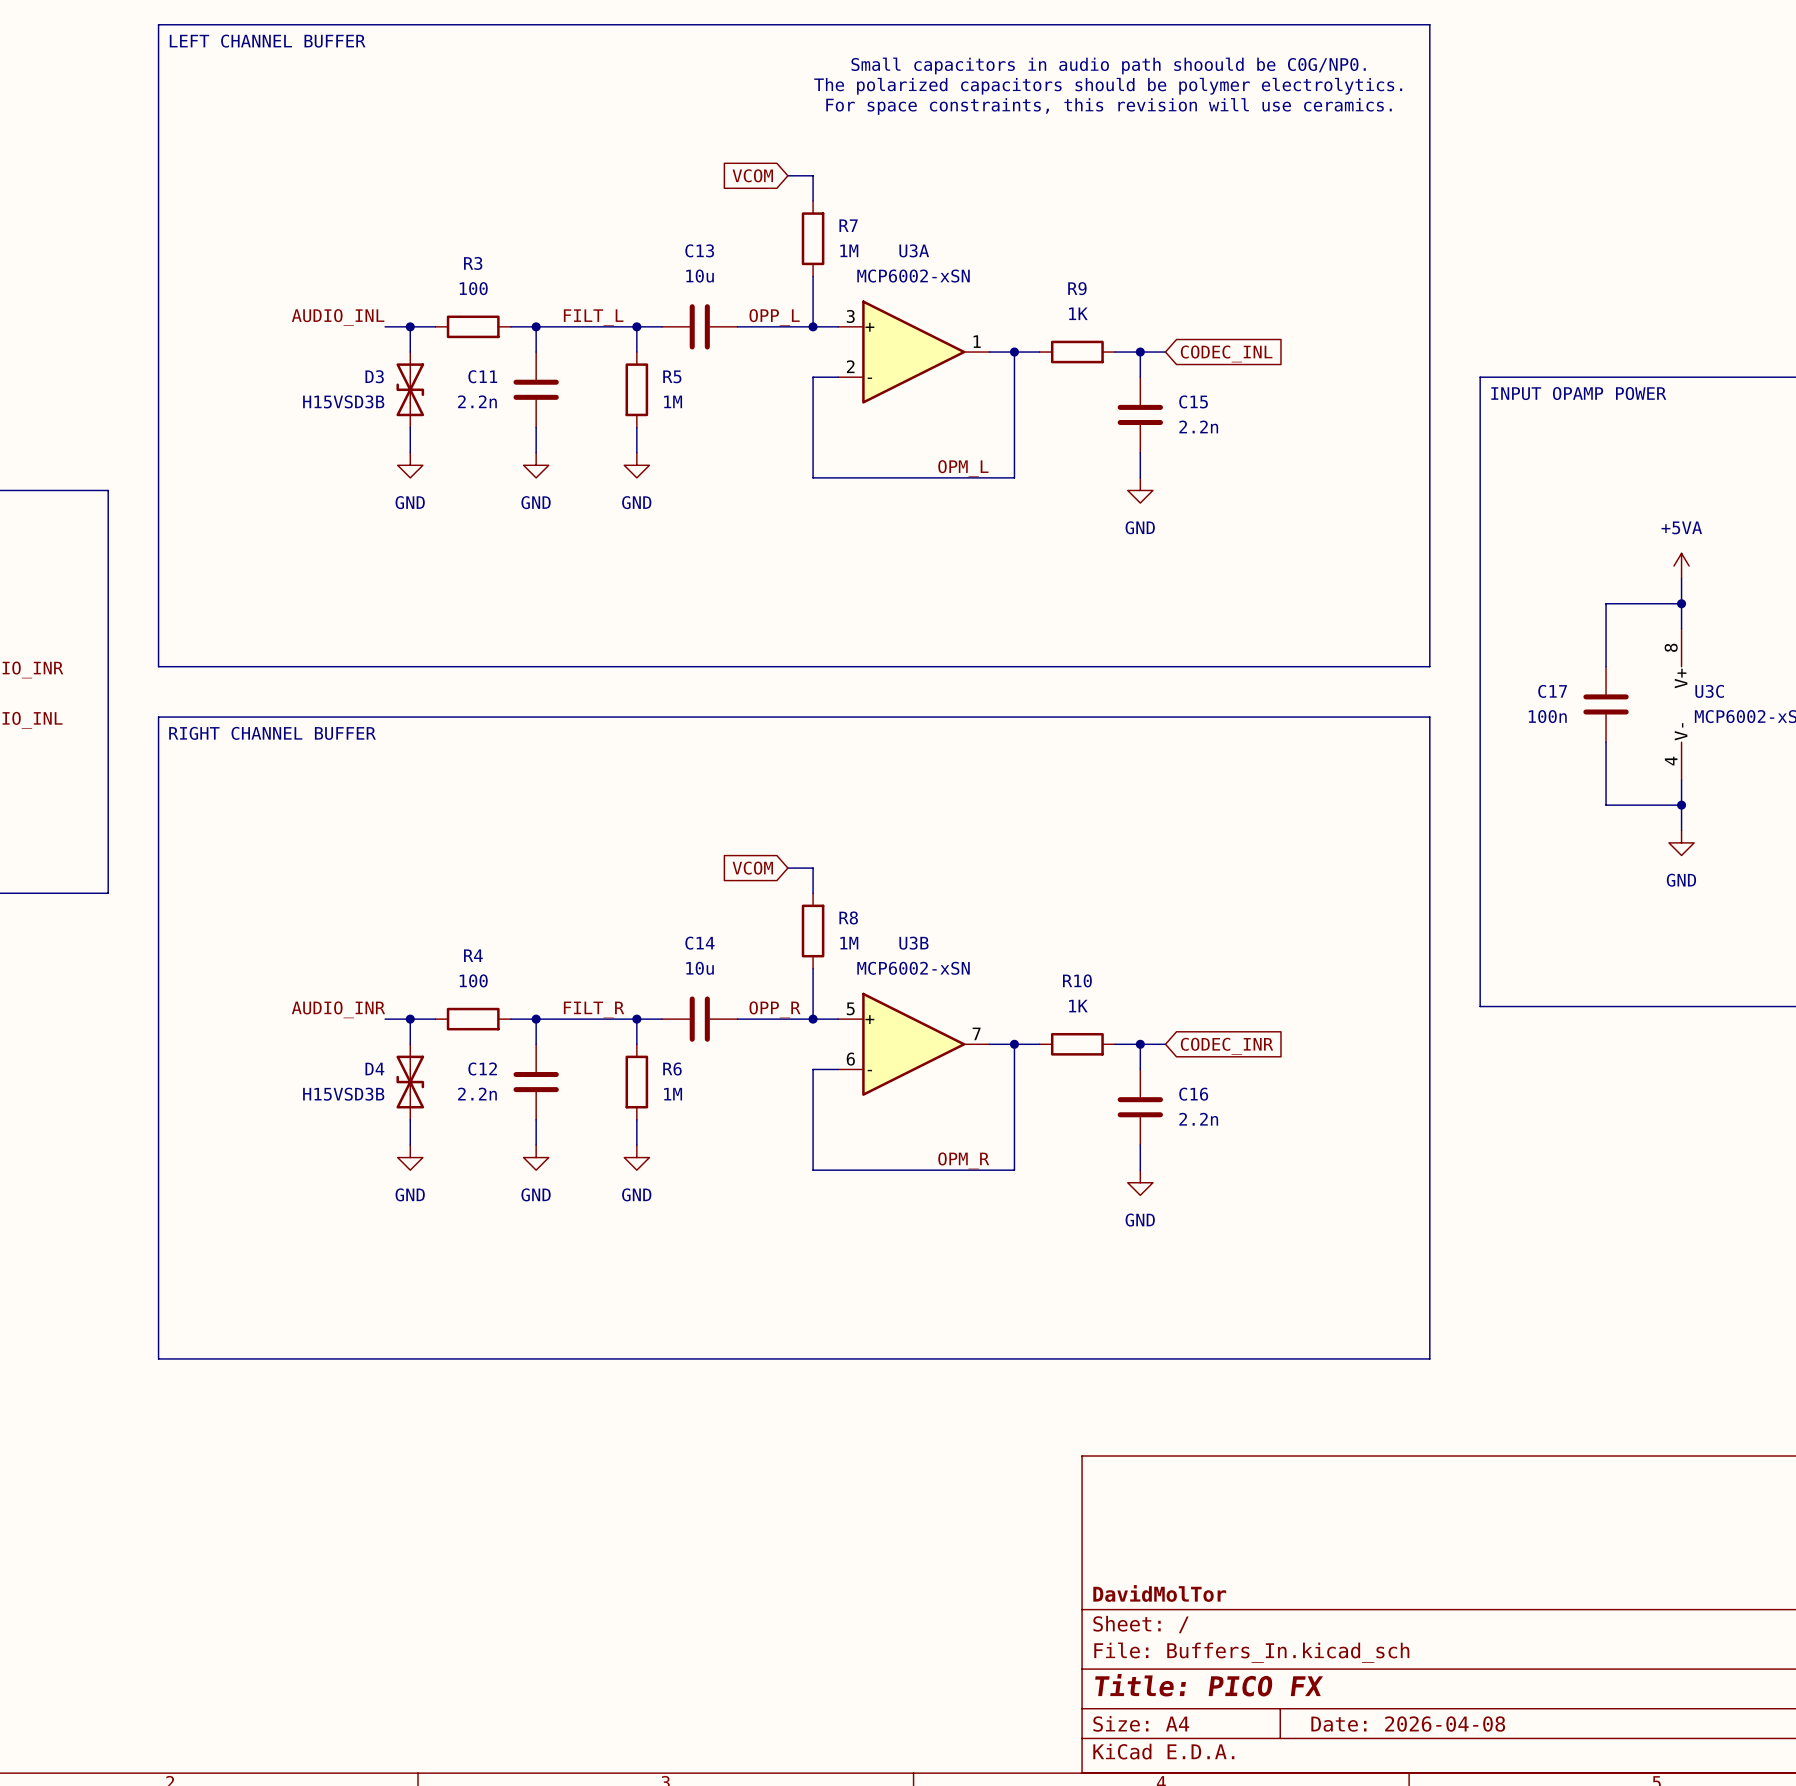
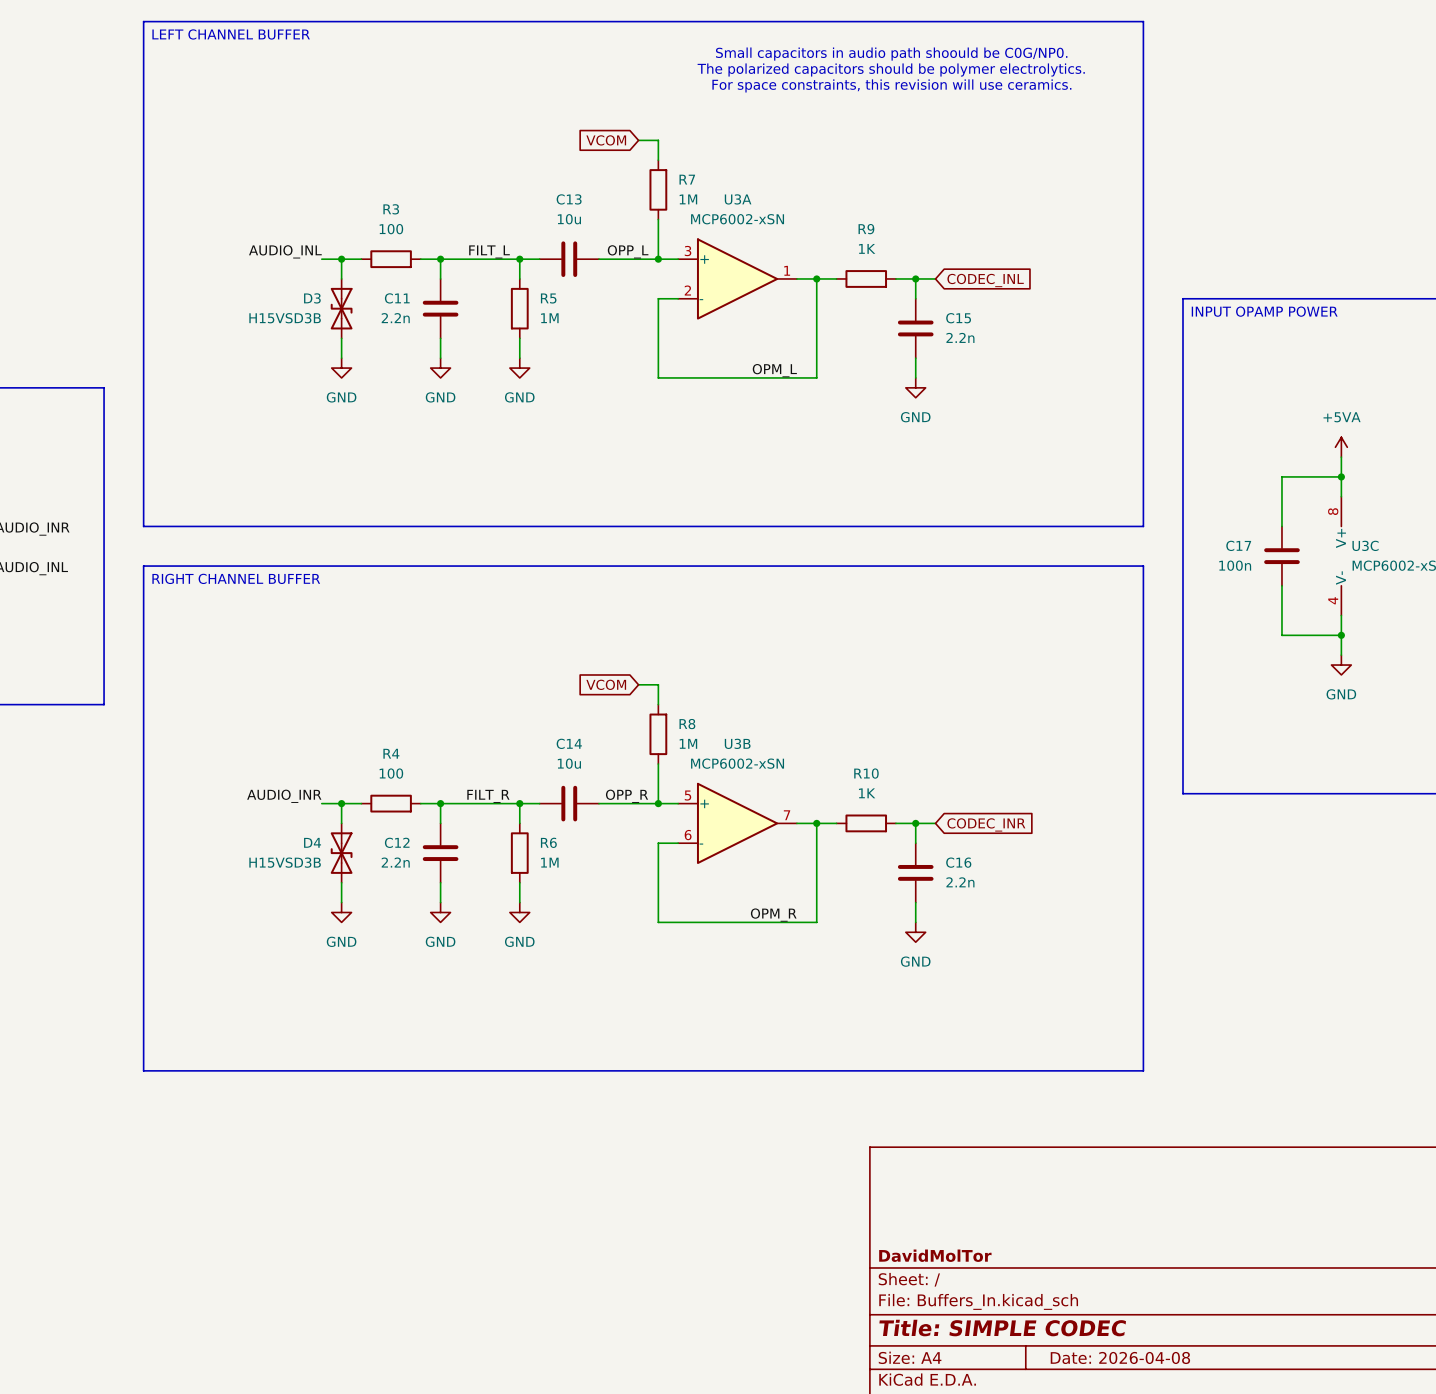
title block: Title: PICO FX (1209, 1685) -> Title: SIMPLE CODEC (1002, 1328)

